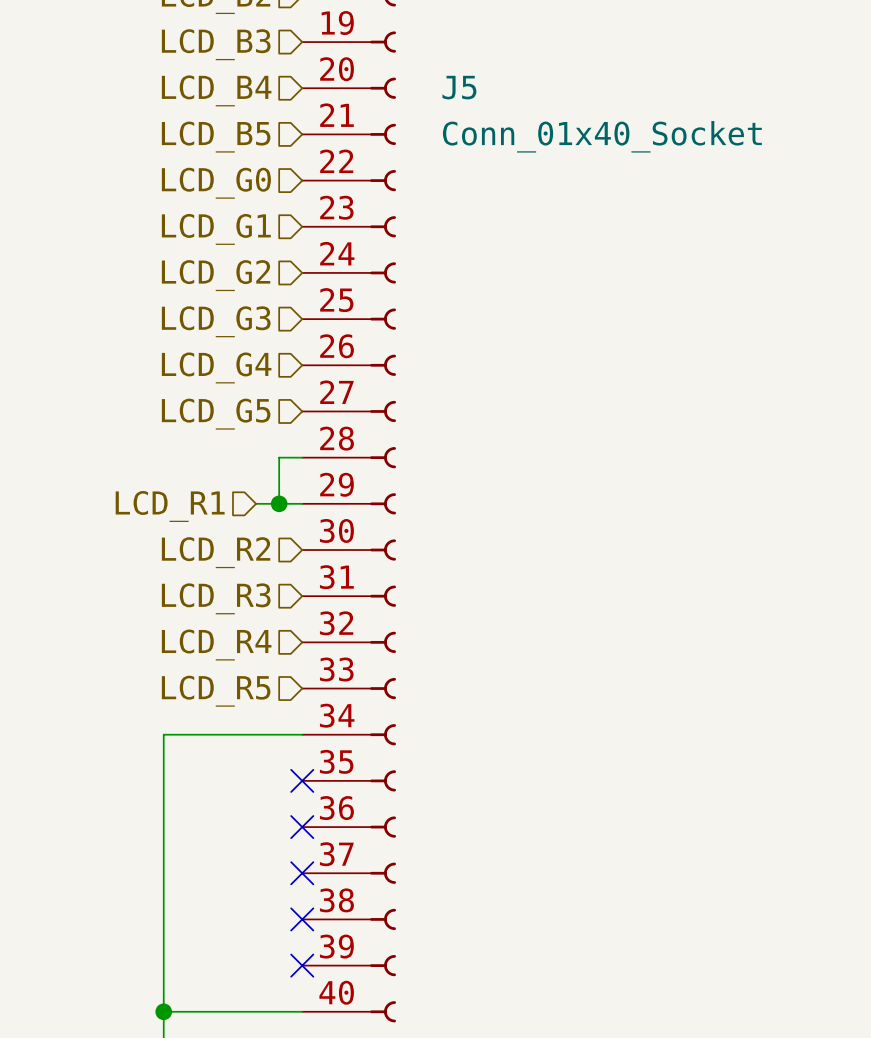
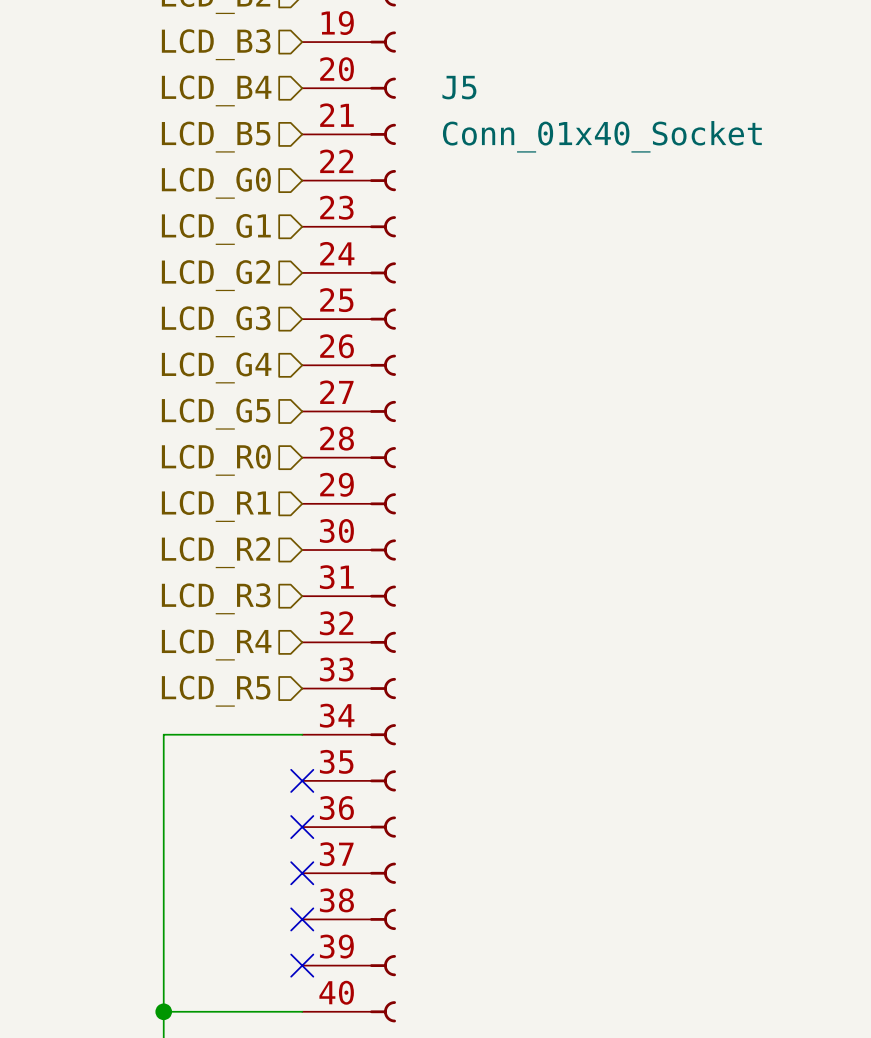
wire: (302, 457) (279, 457) (279, 503) -> none
hierarchical label: none -> LCD_R0 (216, 460)
wire: (256, 503) (302, 503) -> none
junction: (279, 503) -> none
hierarchical label position: LCD_R1 (170, 506) -> LCD_R1 (216, 506)

